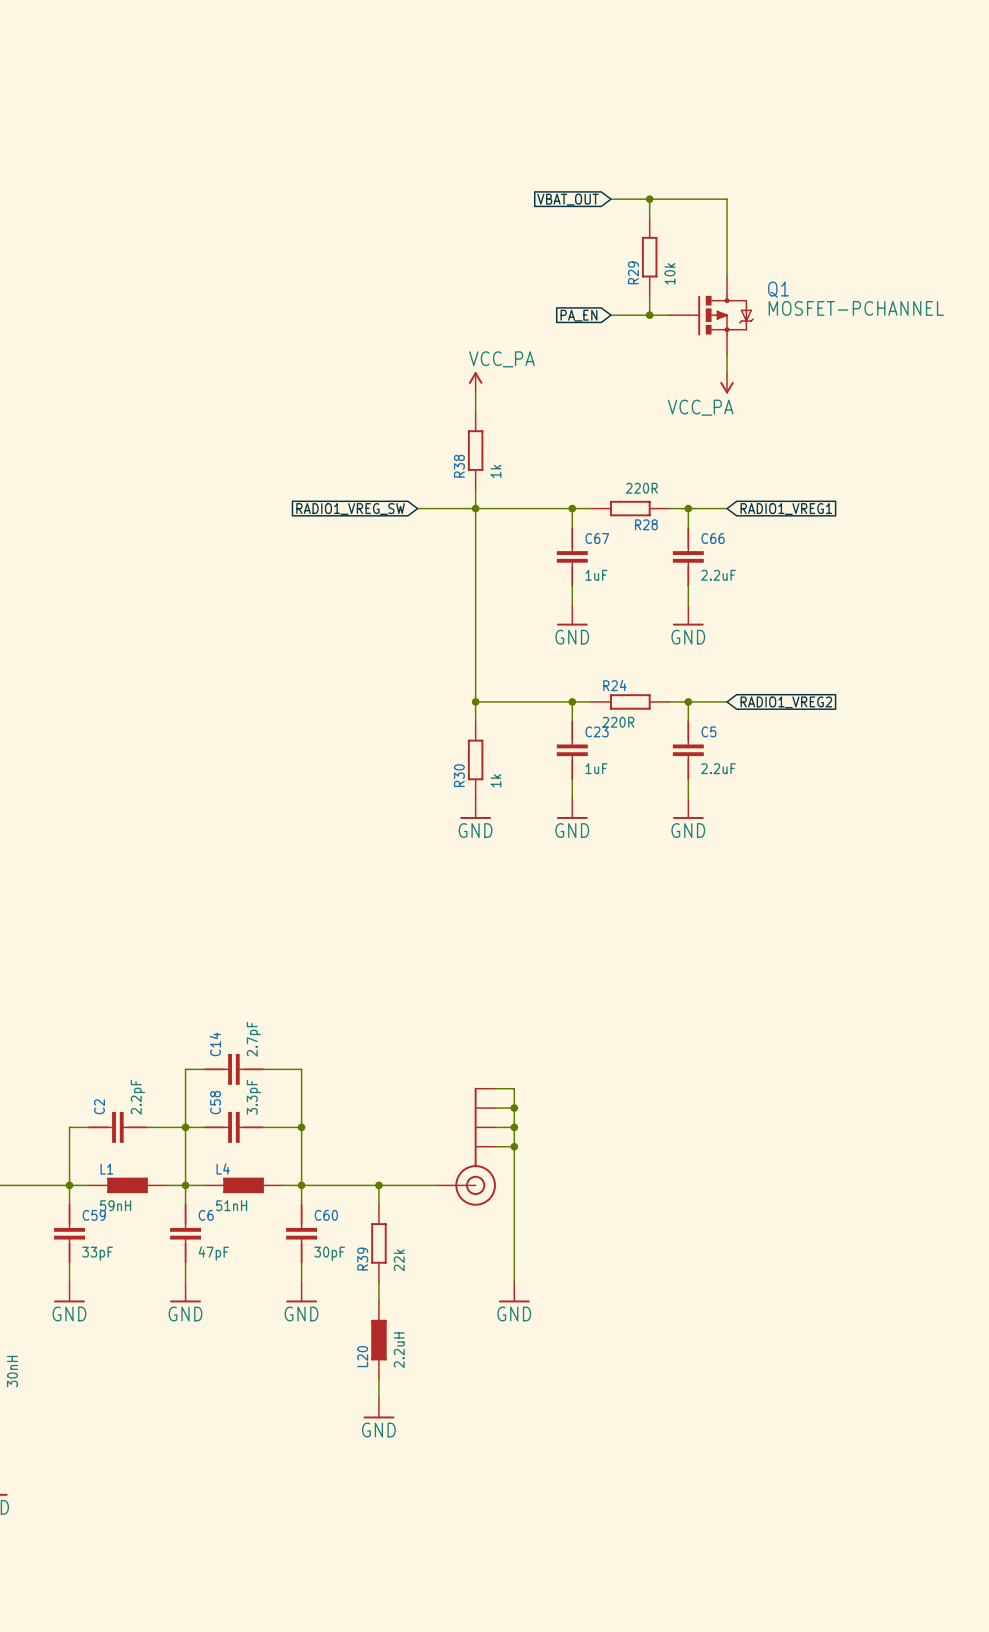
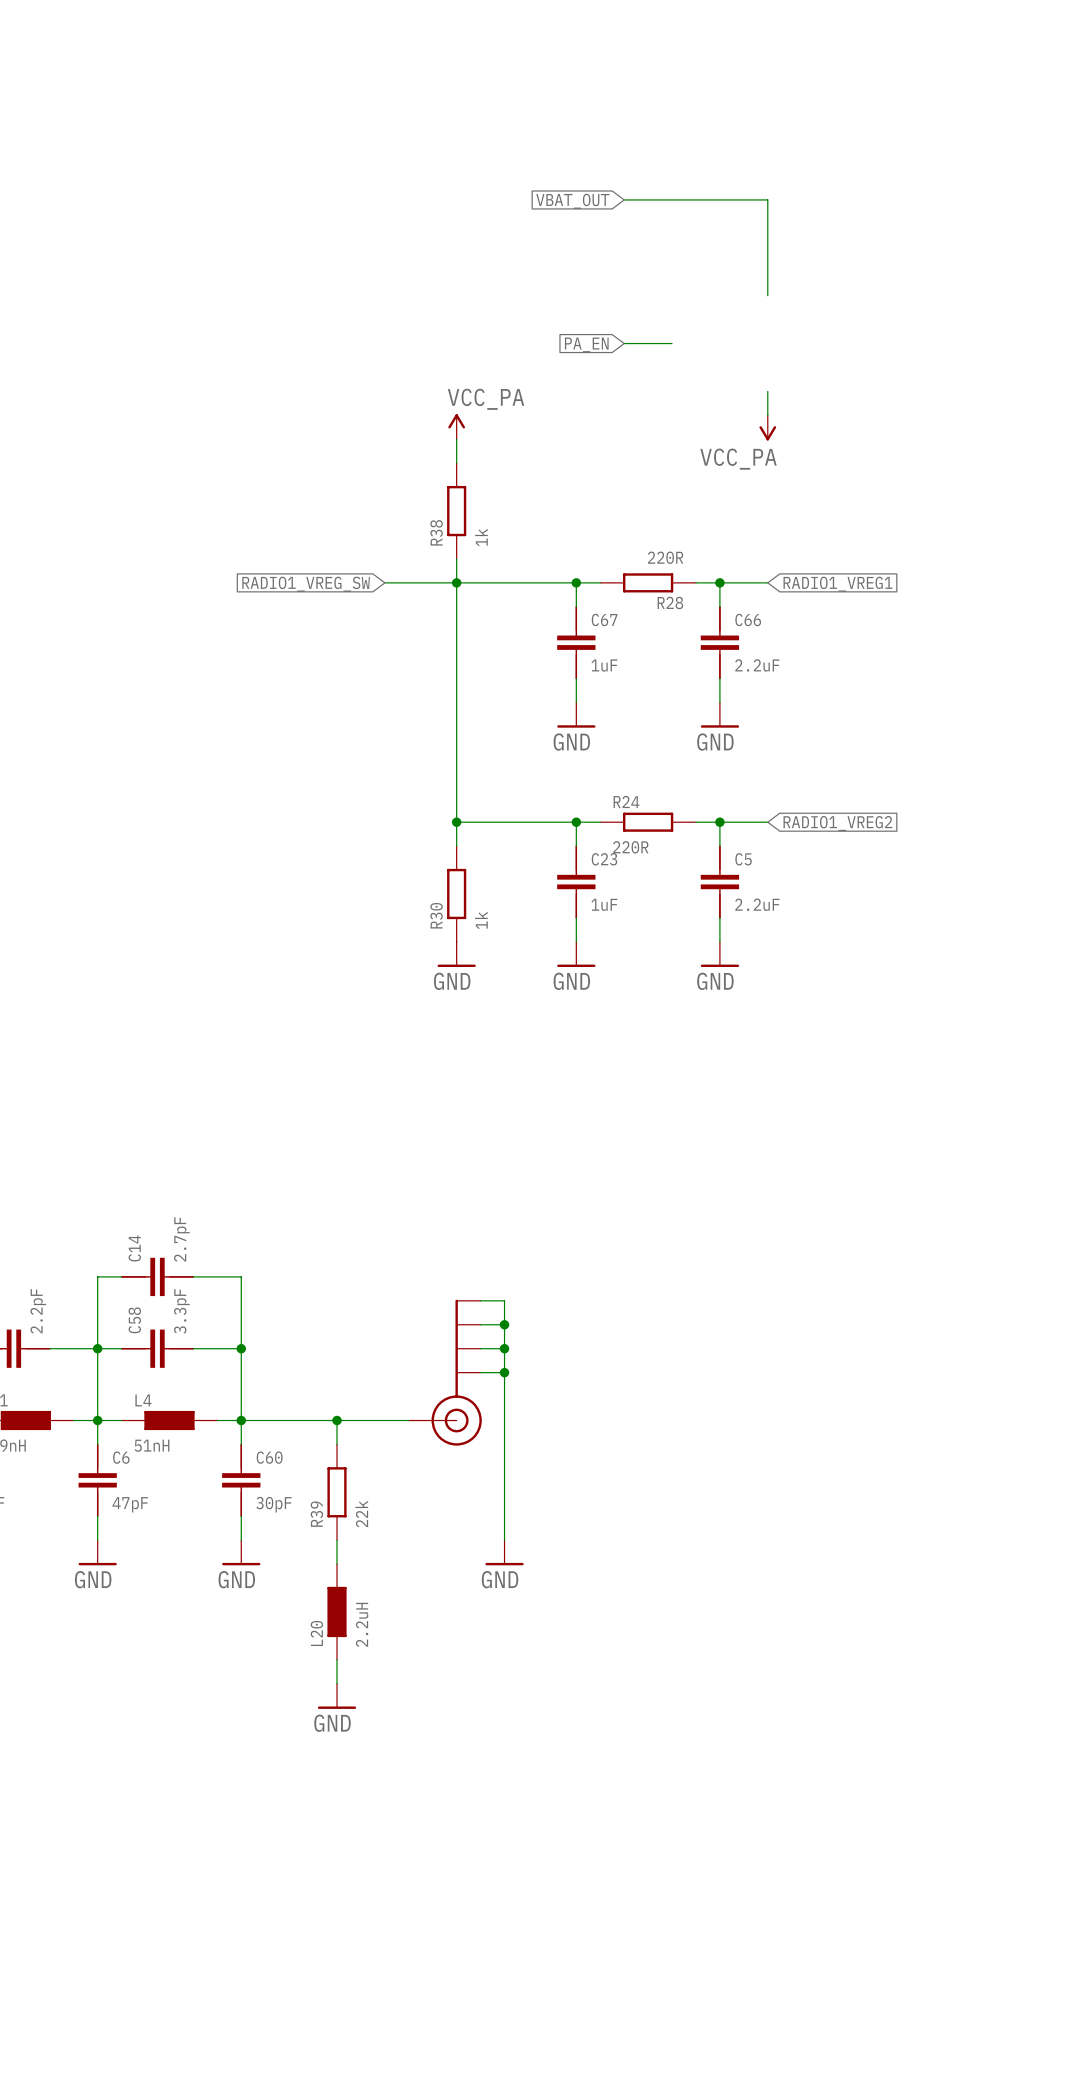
wire: (649, 199) (649, 218) -> none
junction: (649, 199) -> none
R29: 10k (649, 257) -> none
wire: (649, 295) (649, 315) (669, 315) -> none
junction: (649, 315) -> none
Q1: MOSFET-PCHANNEL (711, 315) -> none

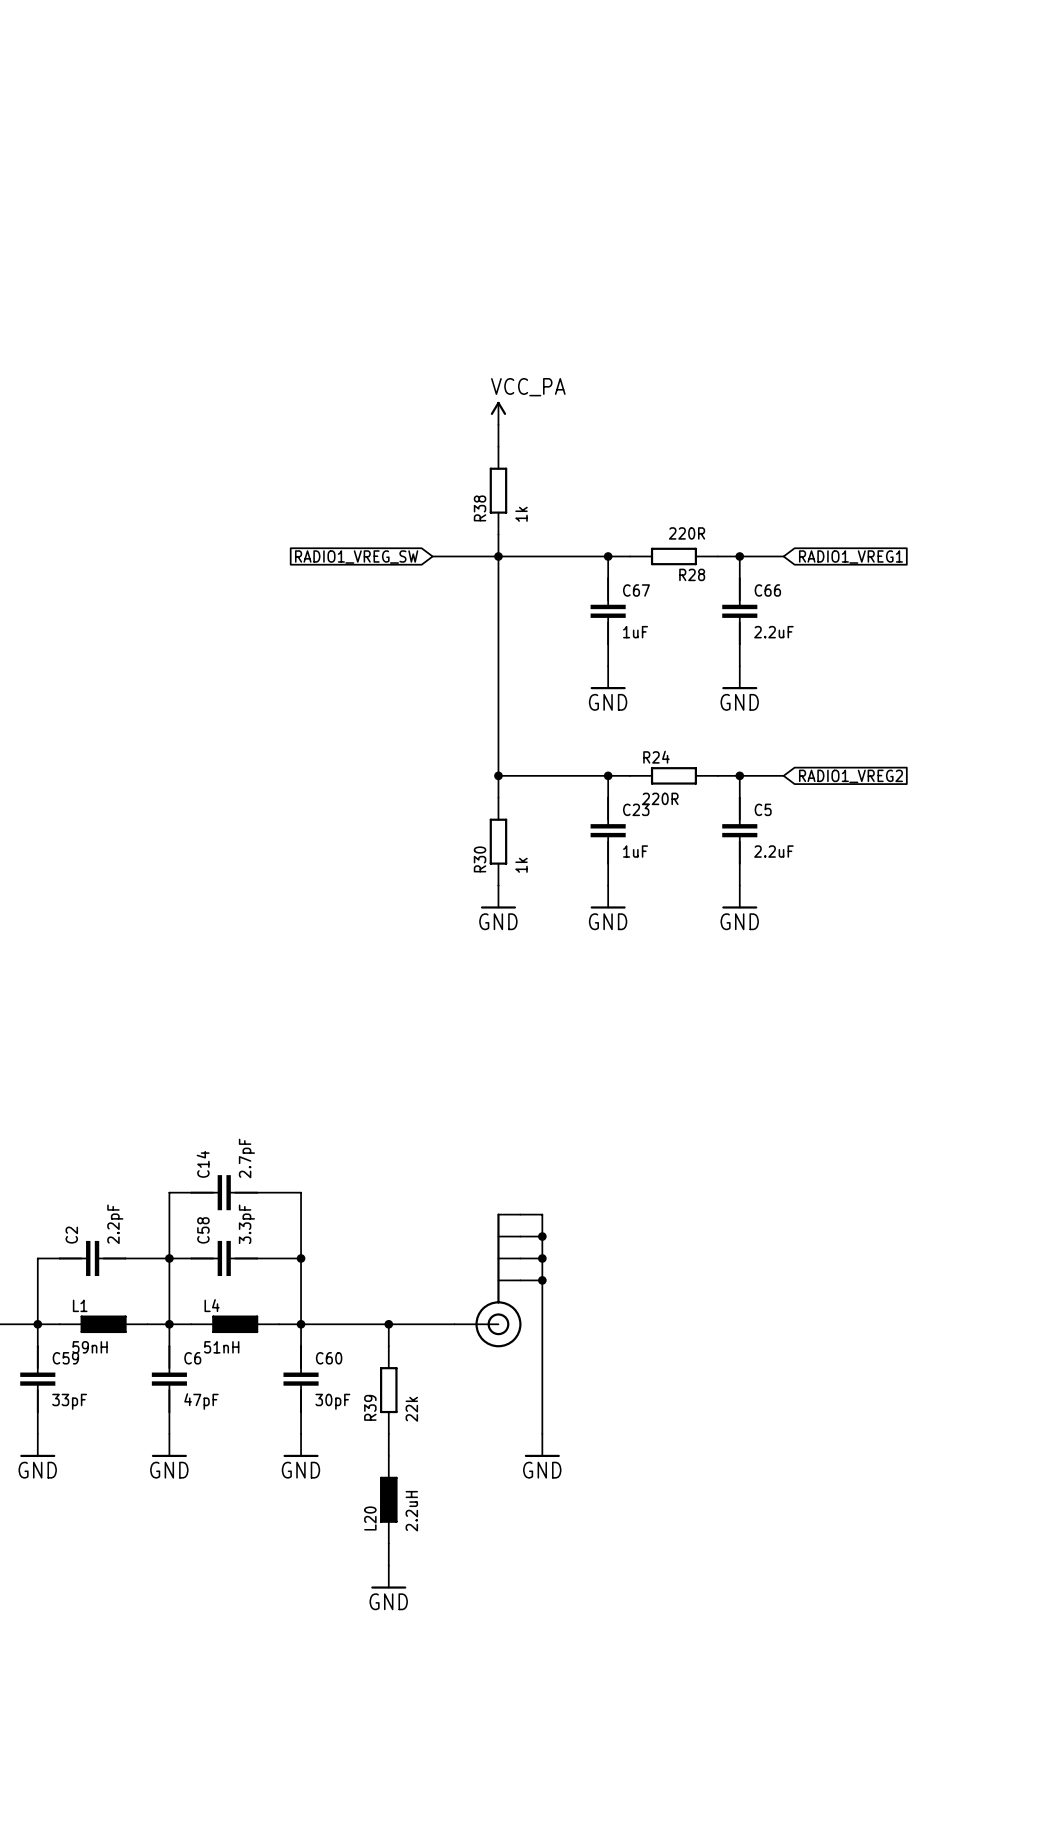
wire: (624, 199) (767, 199) (767, 295) -> none
global label: VBAT_OUT (572, 201) -> none
wire: (624, 343) (672, 343) -> none
global label: PA_EN (586, 345) -> none
wire: (767, 391) (767, 415) -> none
power symbol: VCC_PA (767, 427) -> none

